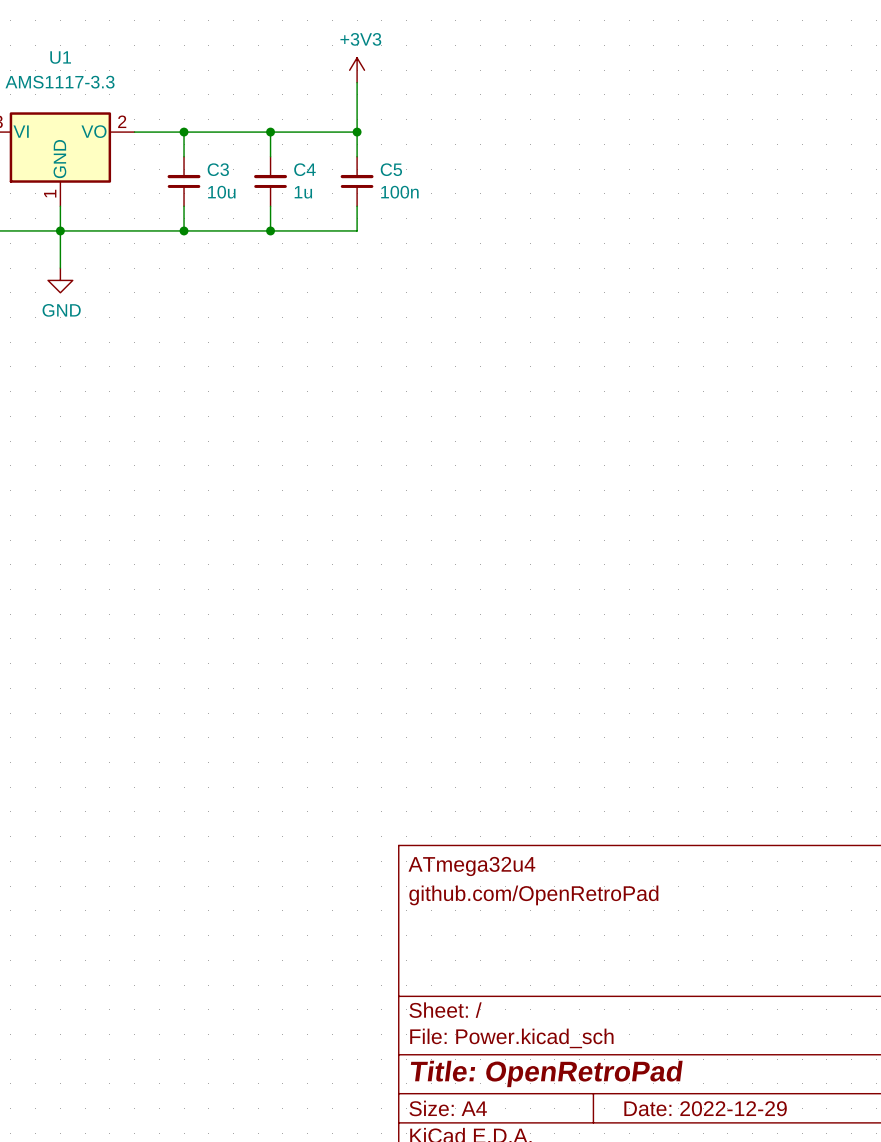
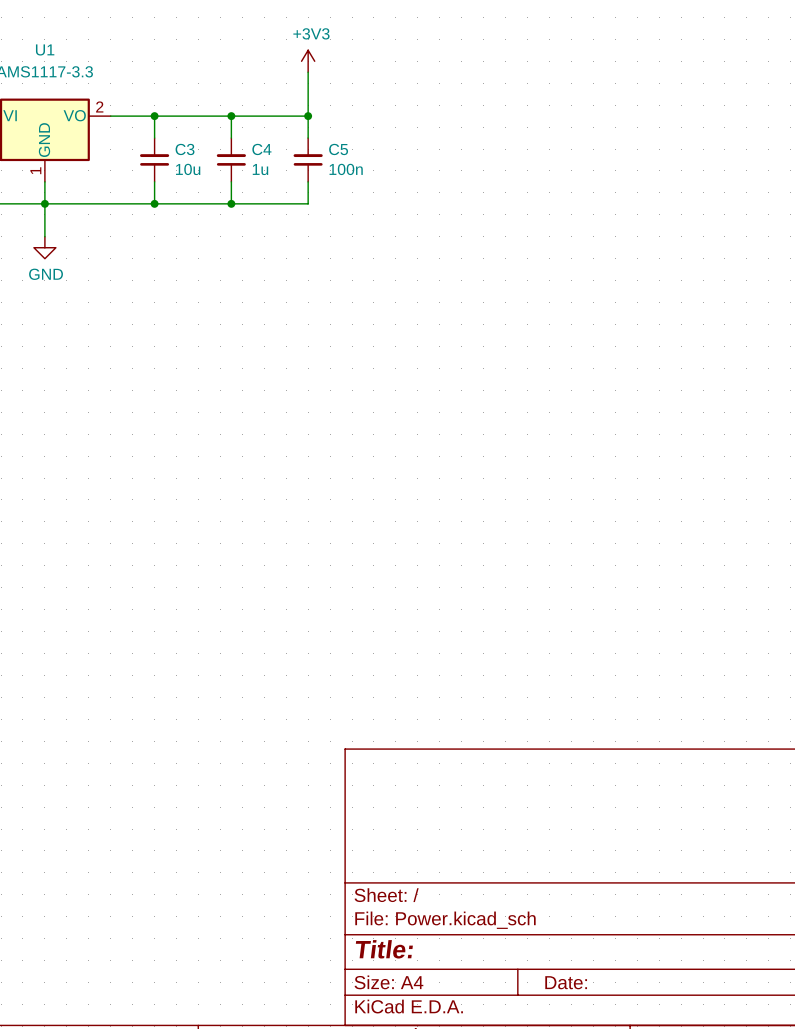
title block: ATmega32u4 (471, 866) -> none
title block: github.com/OpenRetroPad (533, 895) -> none
title block: Title: OpenRetroPad (546, 1073) -> Title: (384, 949)
title block: Date: 2022-12-29 (705, 1108) -> Date: (566, 982)

